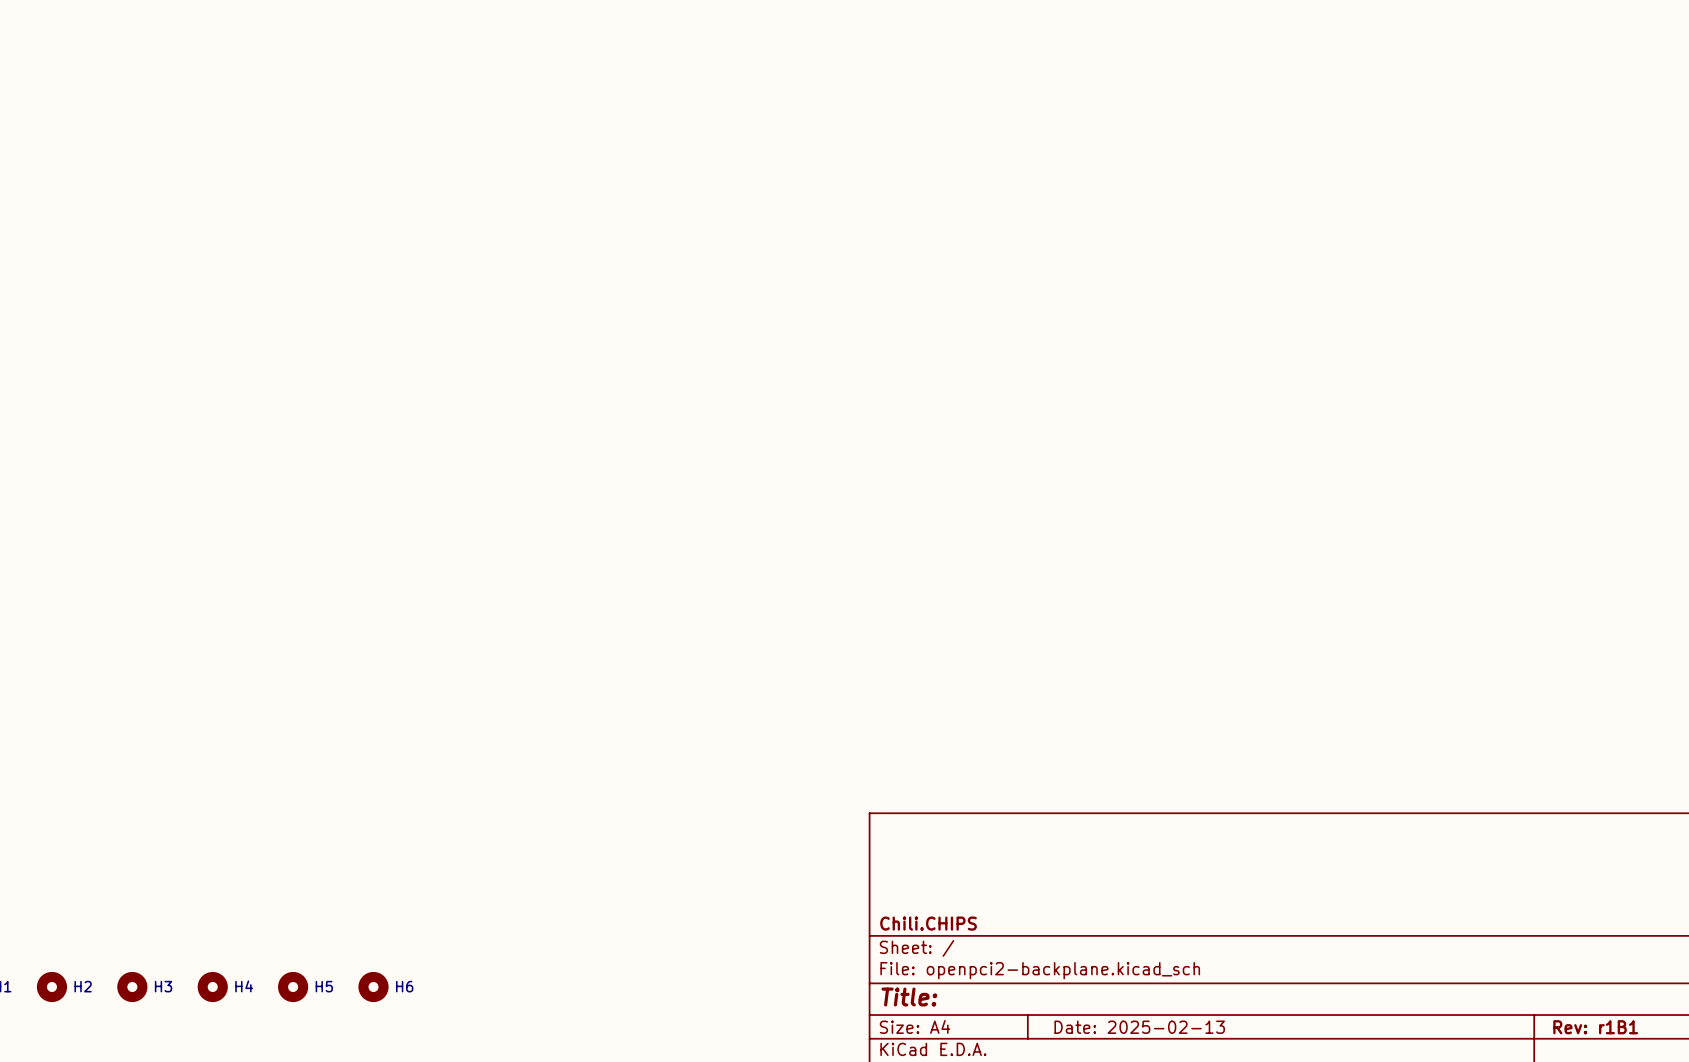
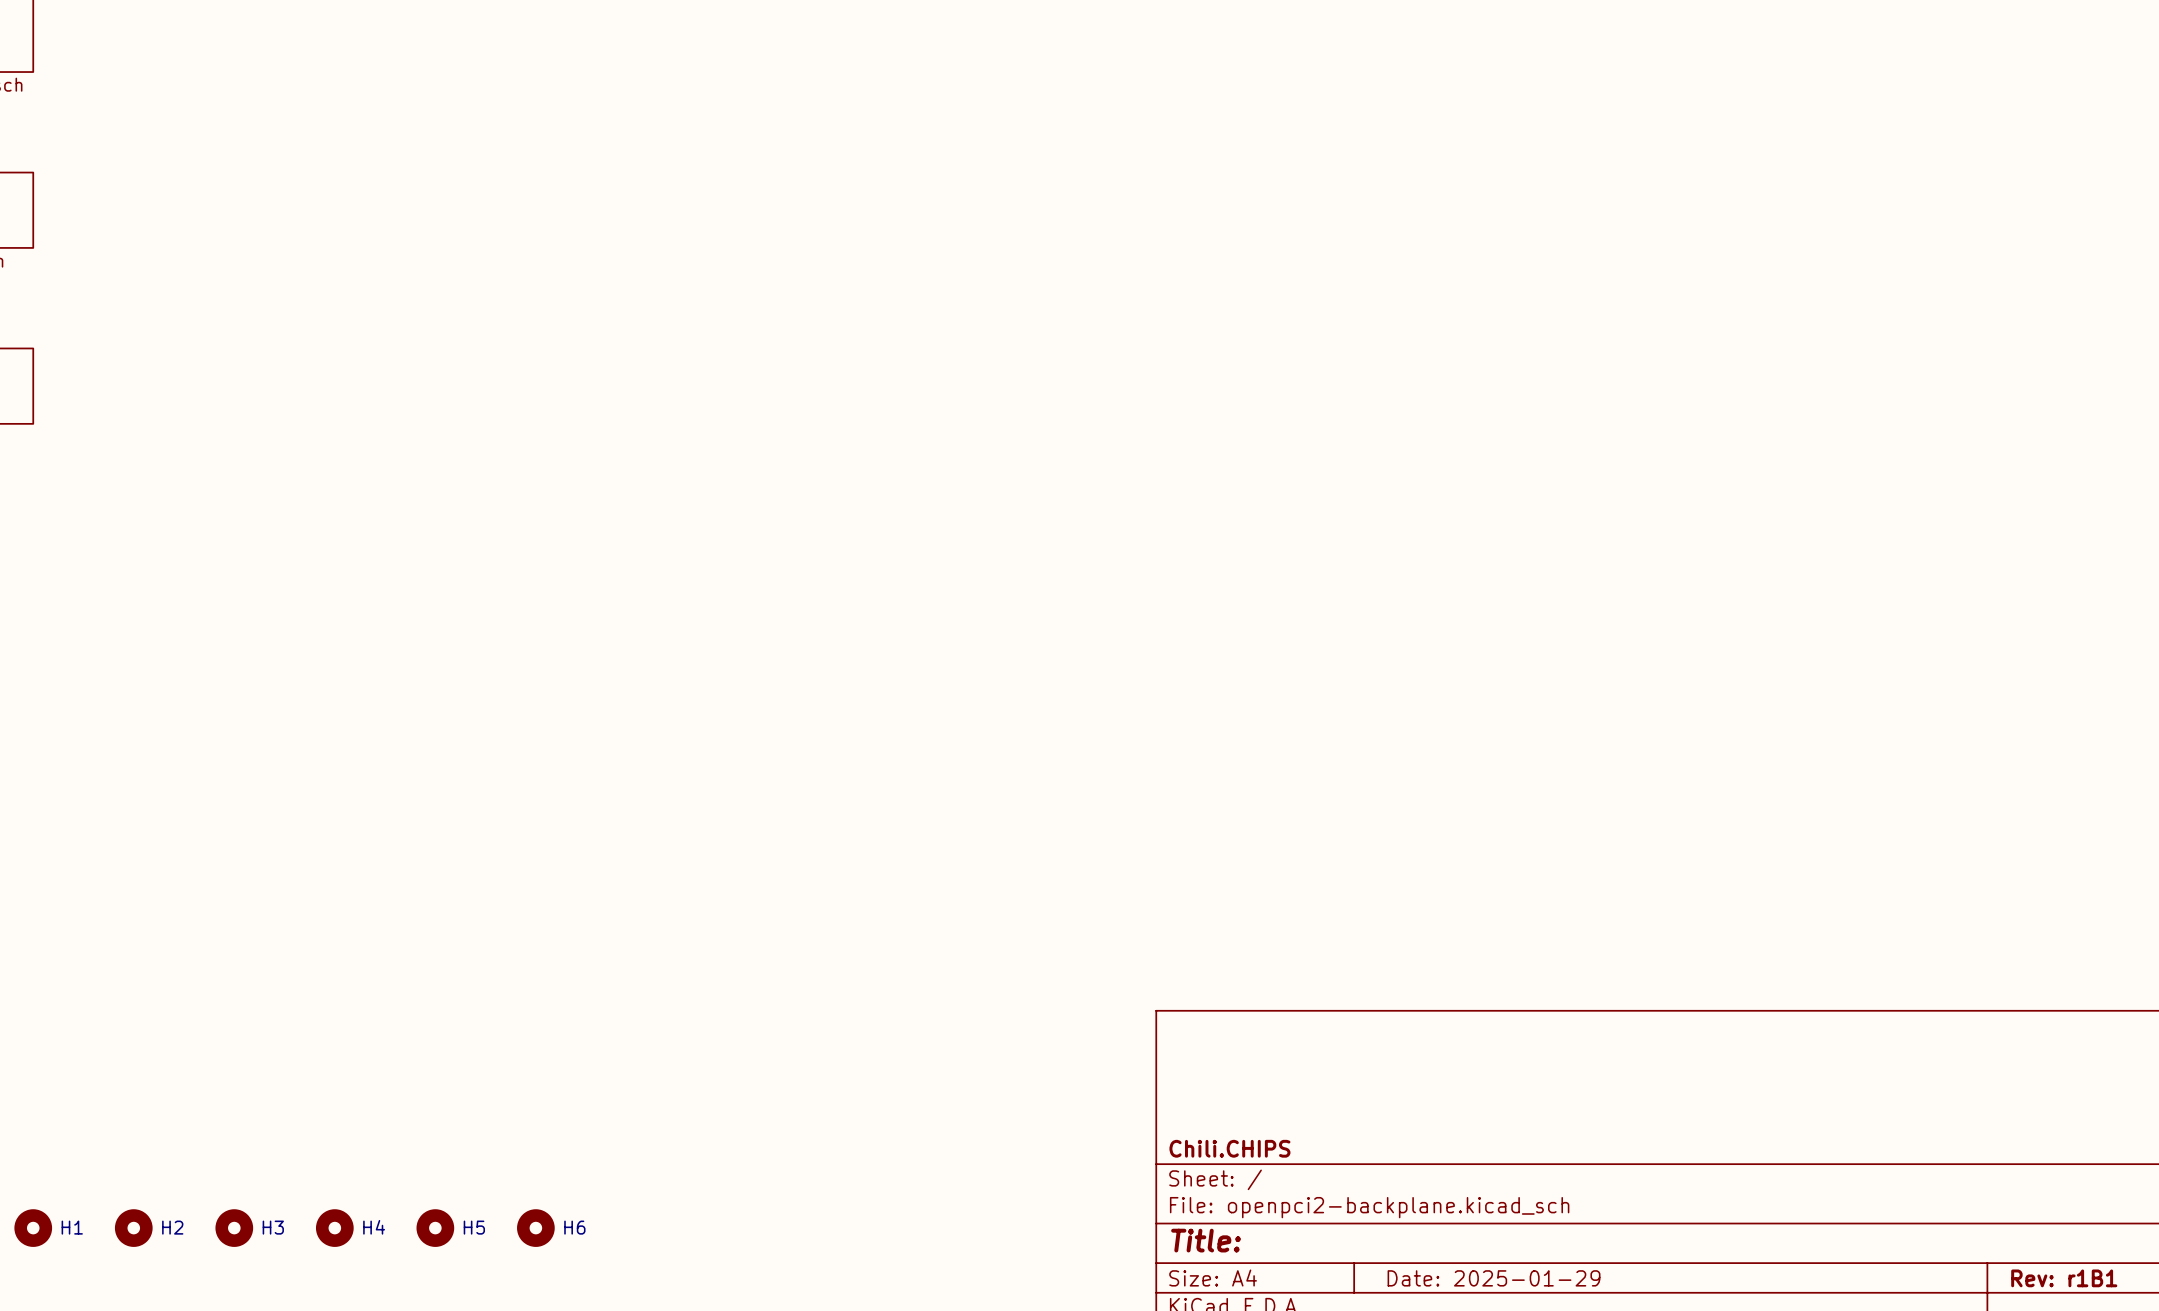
title block: Date: 2025-02-13 (1139, 1027) -> Date: 2025-01-29 (1494, 1278)

